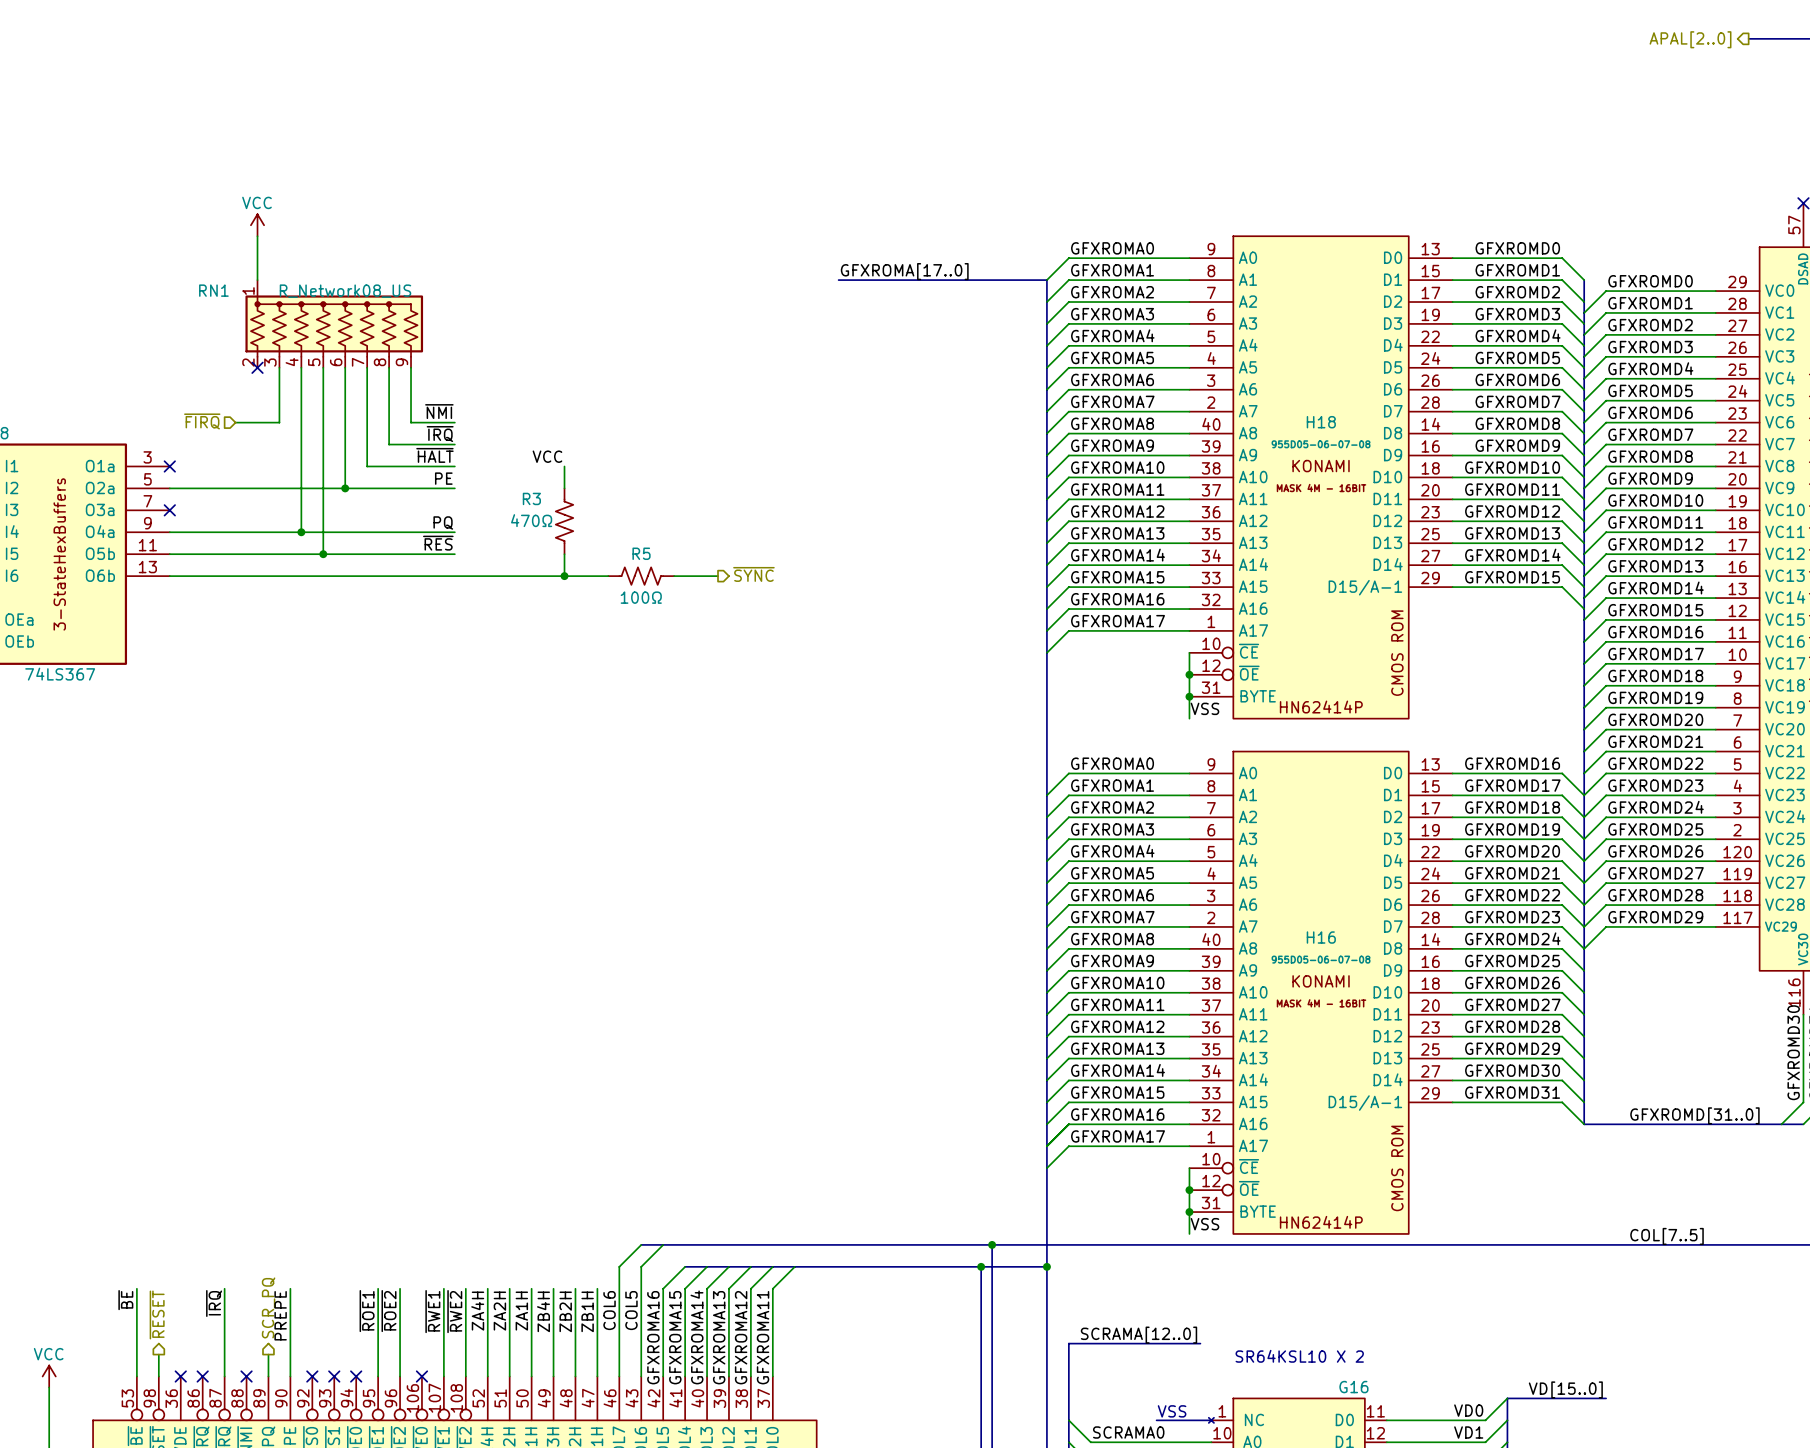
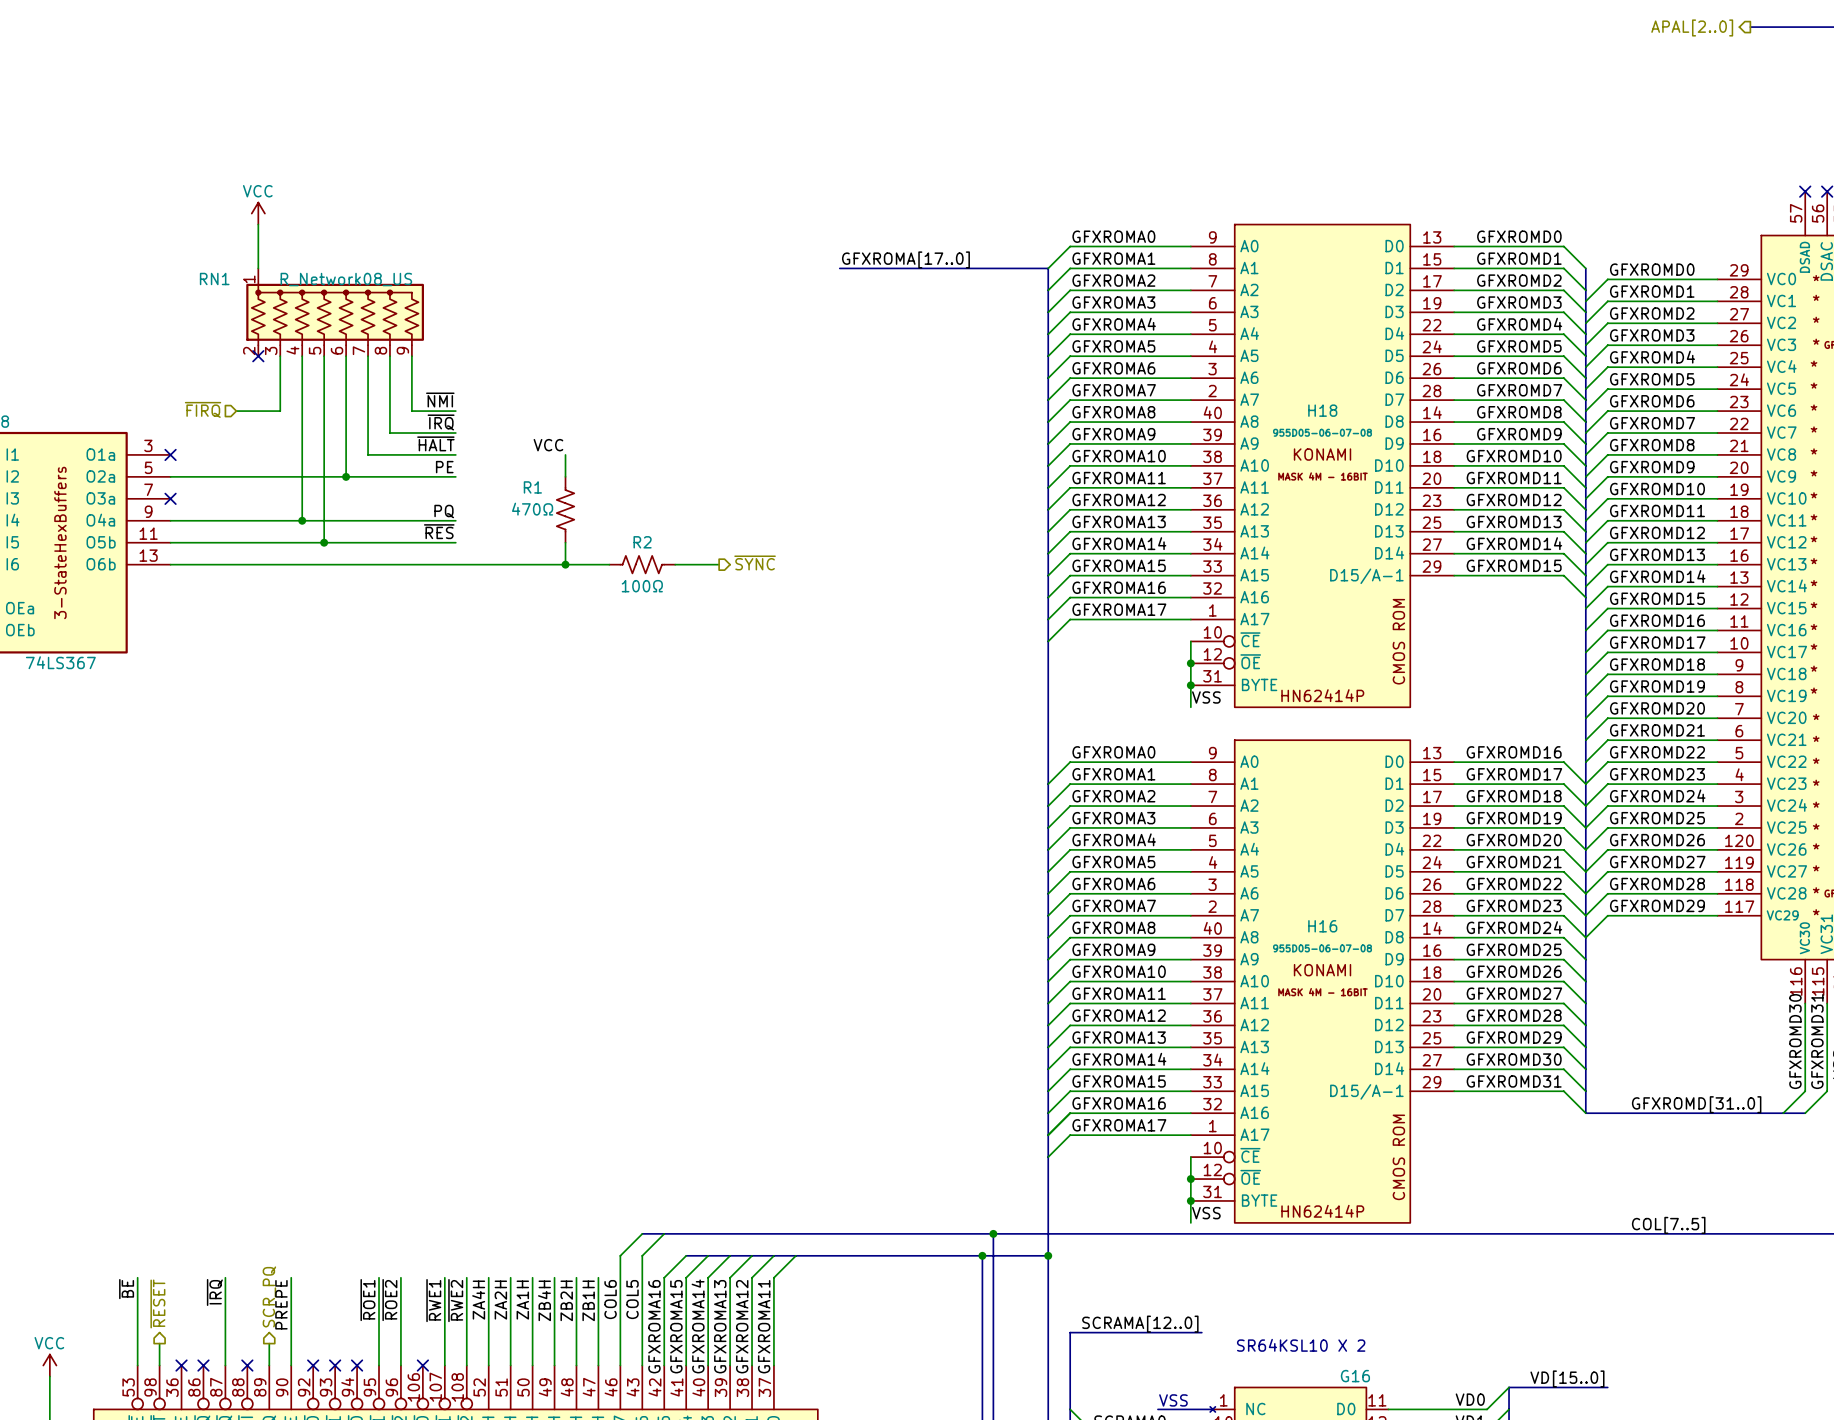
R3 name: R3 (531, 498) -> R1 (532, 487)
R5 name: R5 (641, 553) -> R2 (642, 542)

